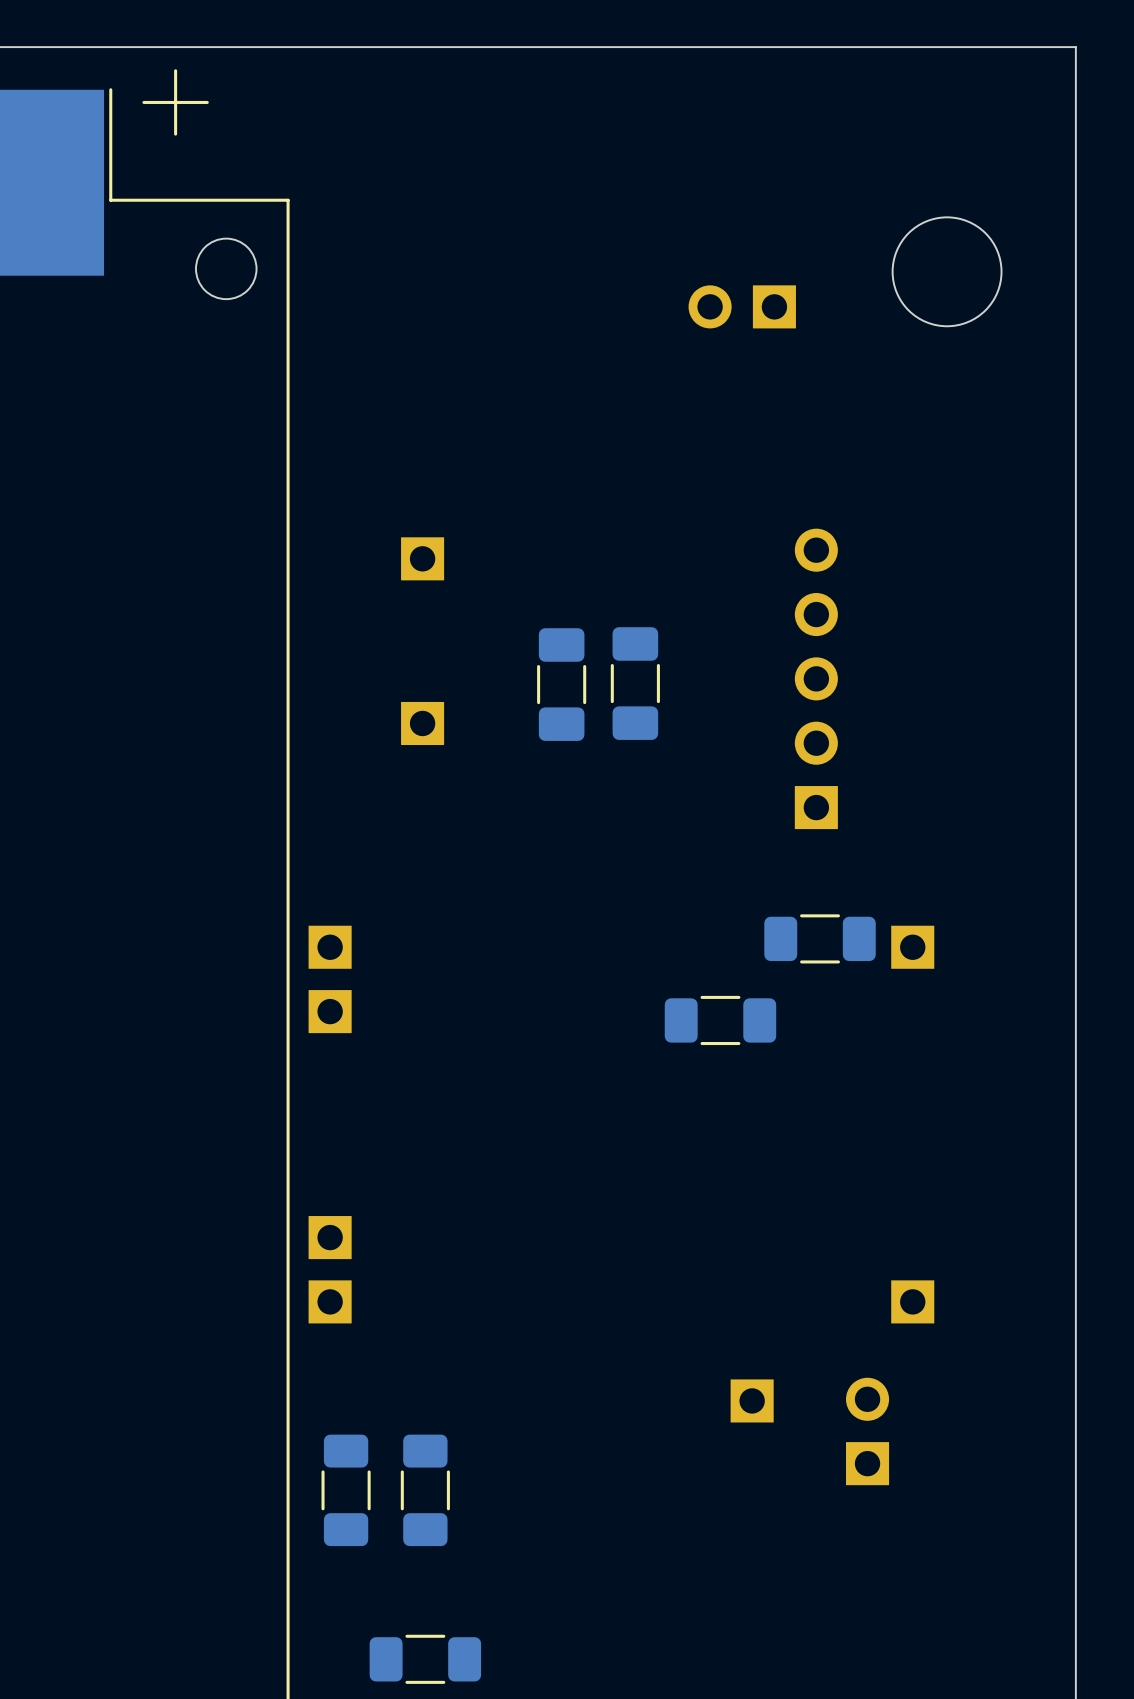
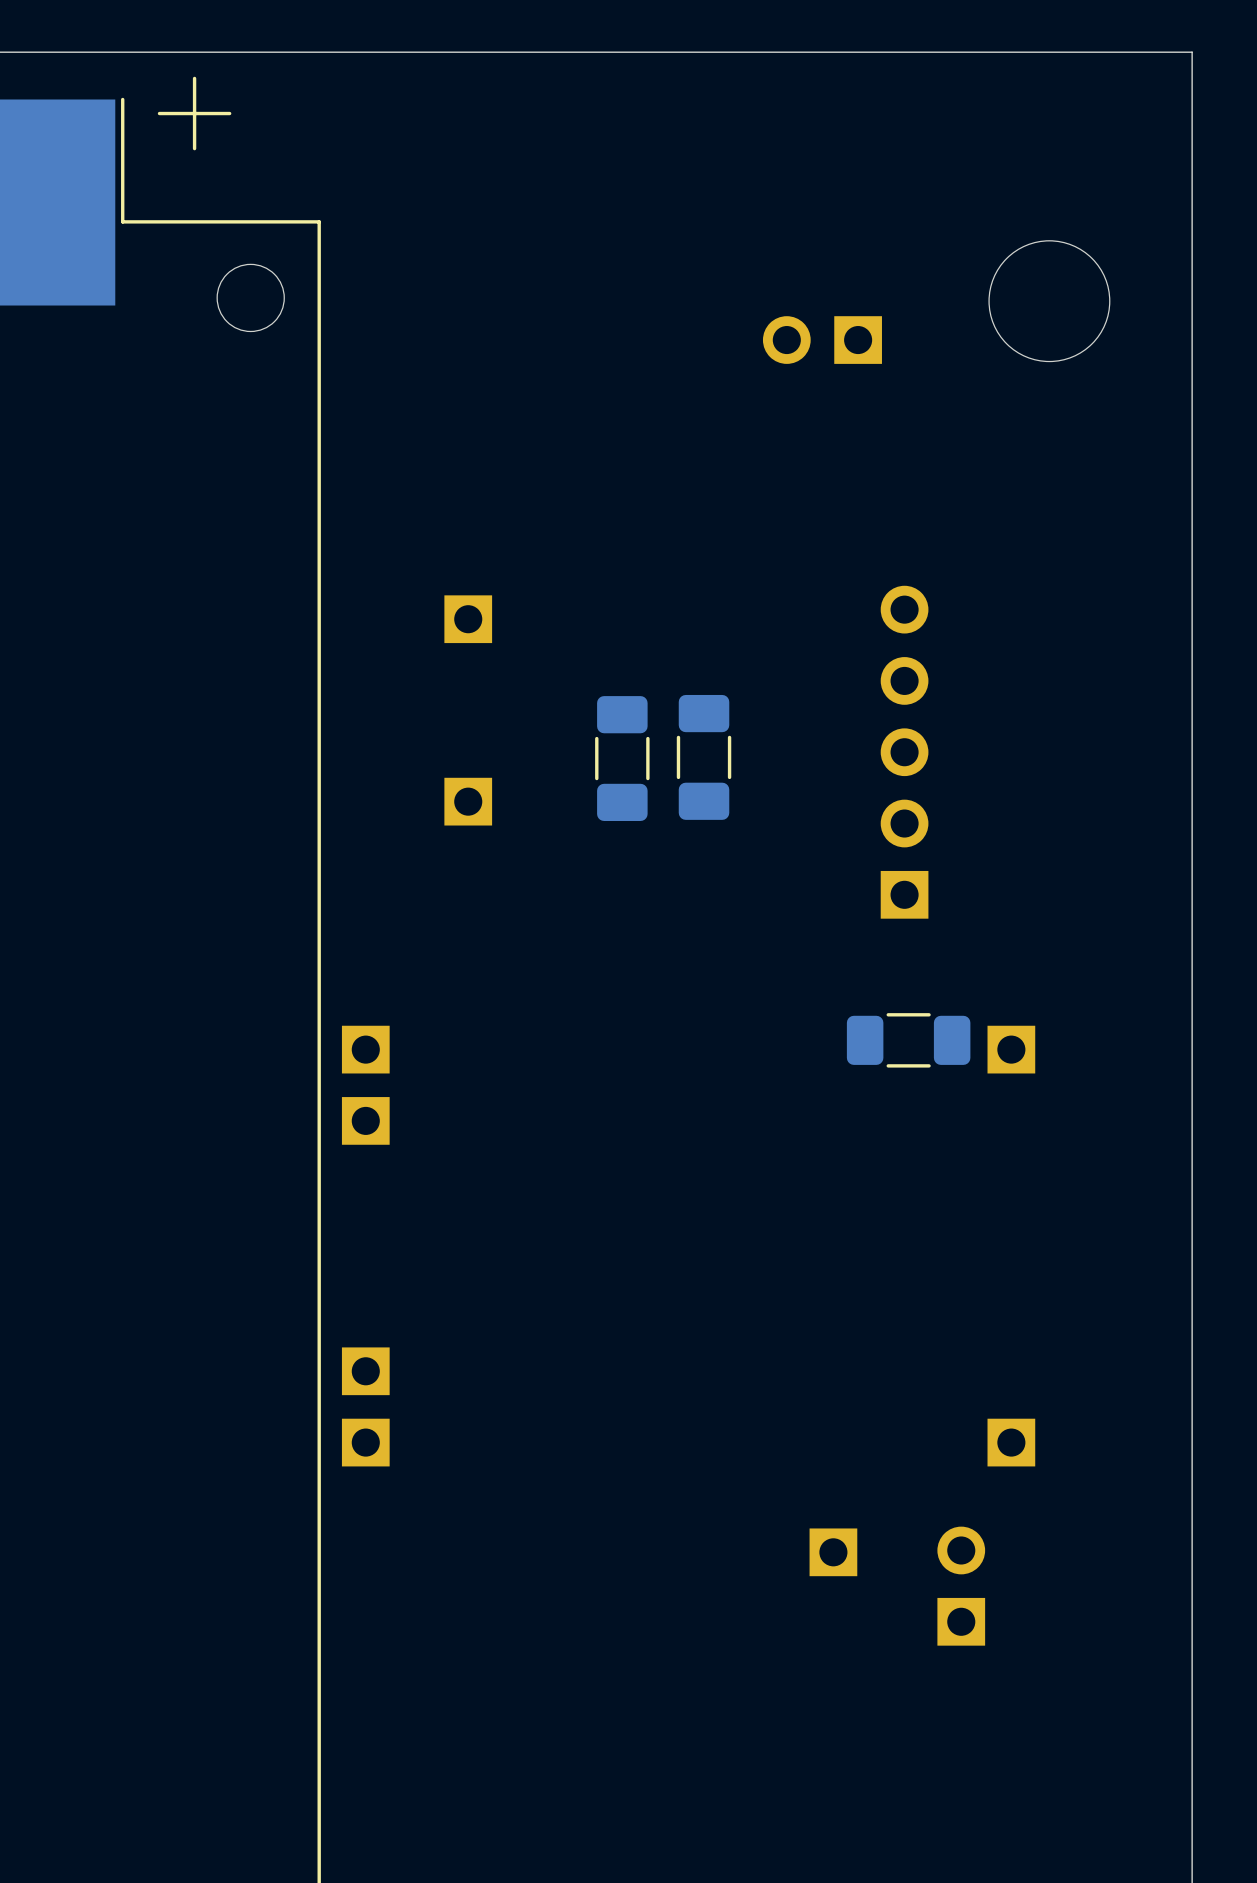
part: (720, 1020) -> none
part: (346, 1490) -> none
part: (425, 1490) -> none
part: (425, 1659) -> none

